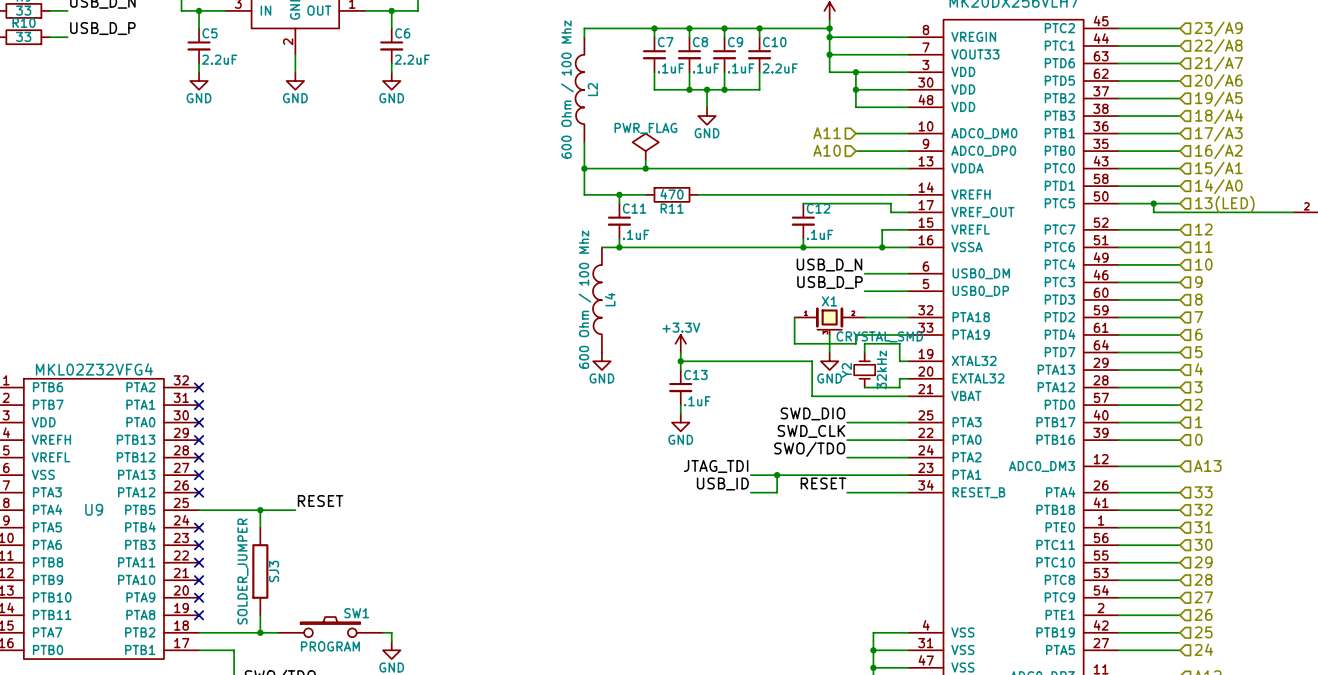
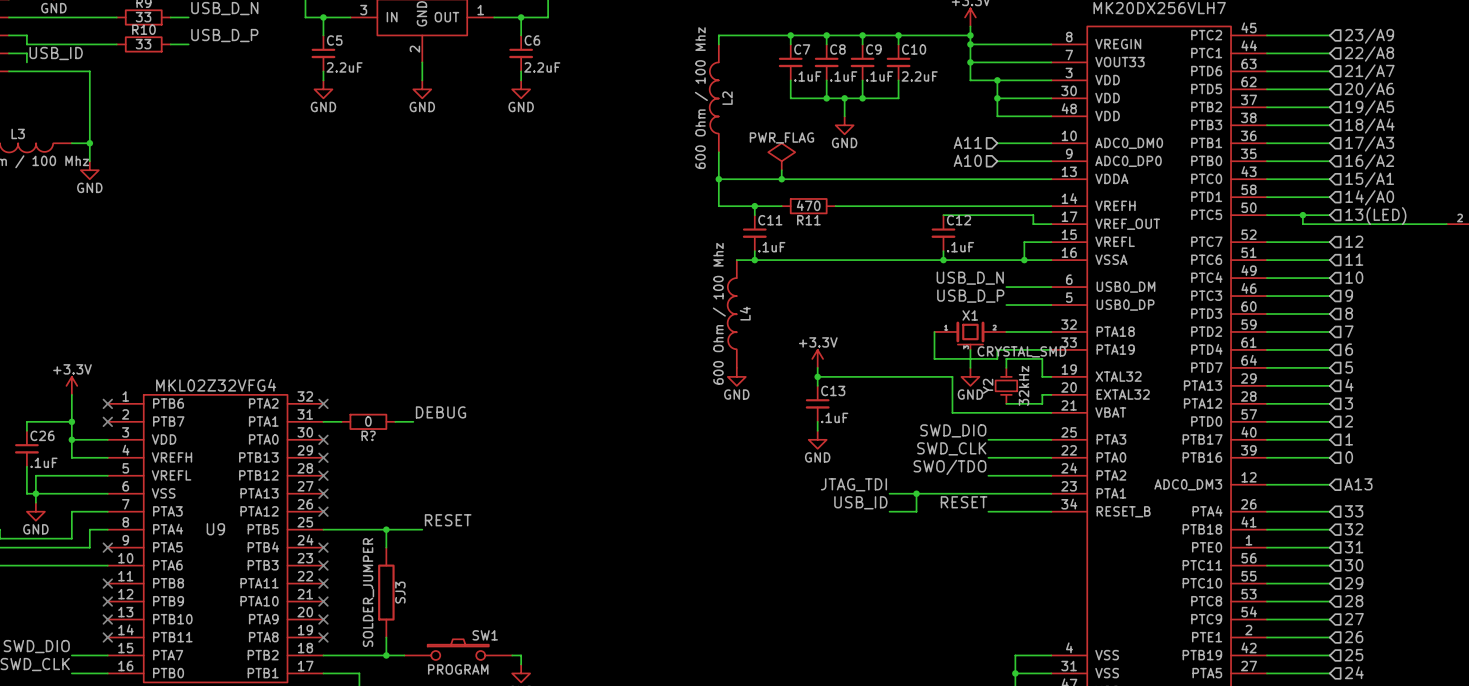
label: none -> DEBUG (440, 412)
wire: none -> (323, 421) (341, 421)
no-connect mark: (199, 405) -> none
R?: none -> 0 (368, 421)
wire: none -> (395, 421) (413, 421)

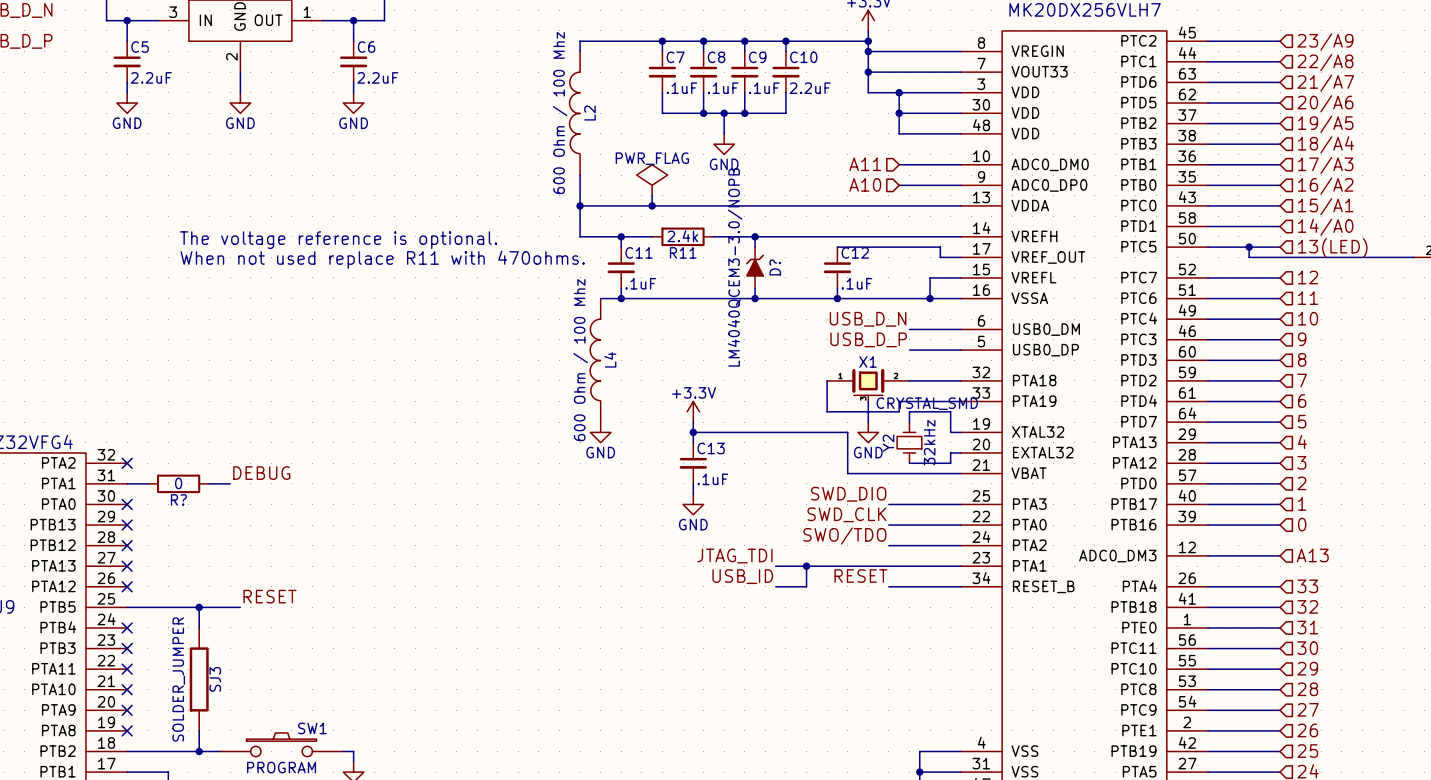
R11 value: 470 (808, 205) -> 2.4k (682, 236)
wire: none -> (755, 236) (755, 247)
junction: none -> (755, 236)
text: none -> The voltage reference is optional. (338, 240)
text: none -> When not used replace R11 with 470ohms. (382, 259)
D?: none -> LM4040QCEM3-3.0/NOPB (755, 267)
wire: none -> (755, 288) (755, 298)
junction: none -> (755, 298)

